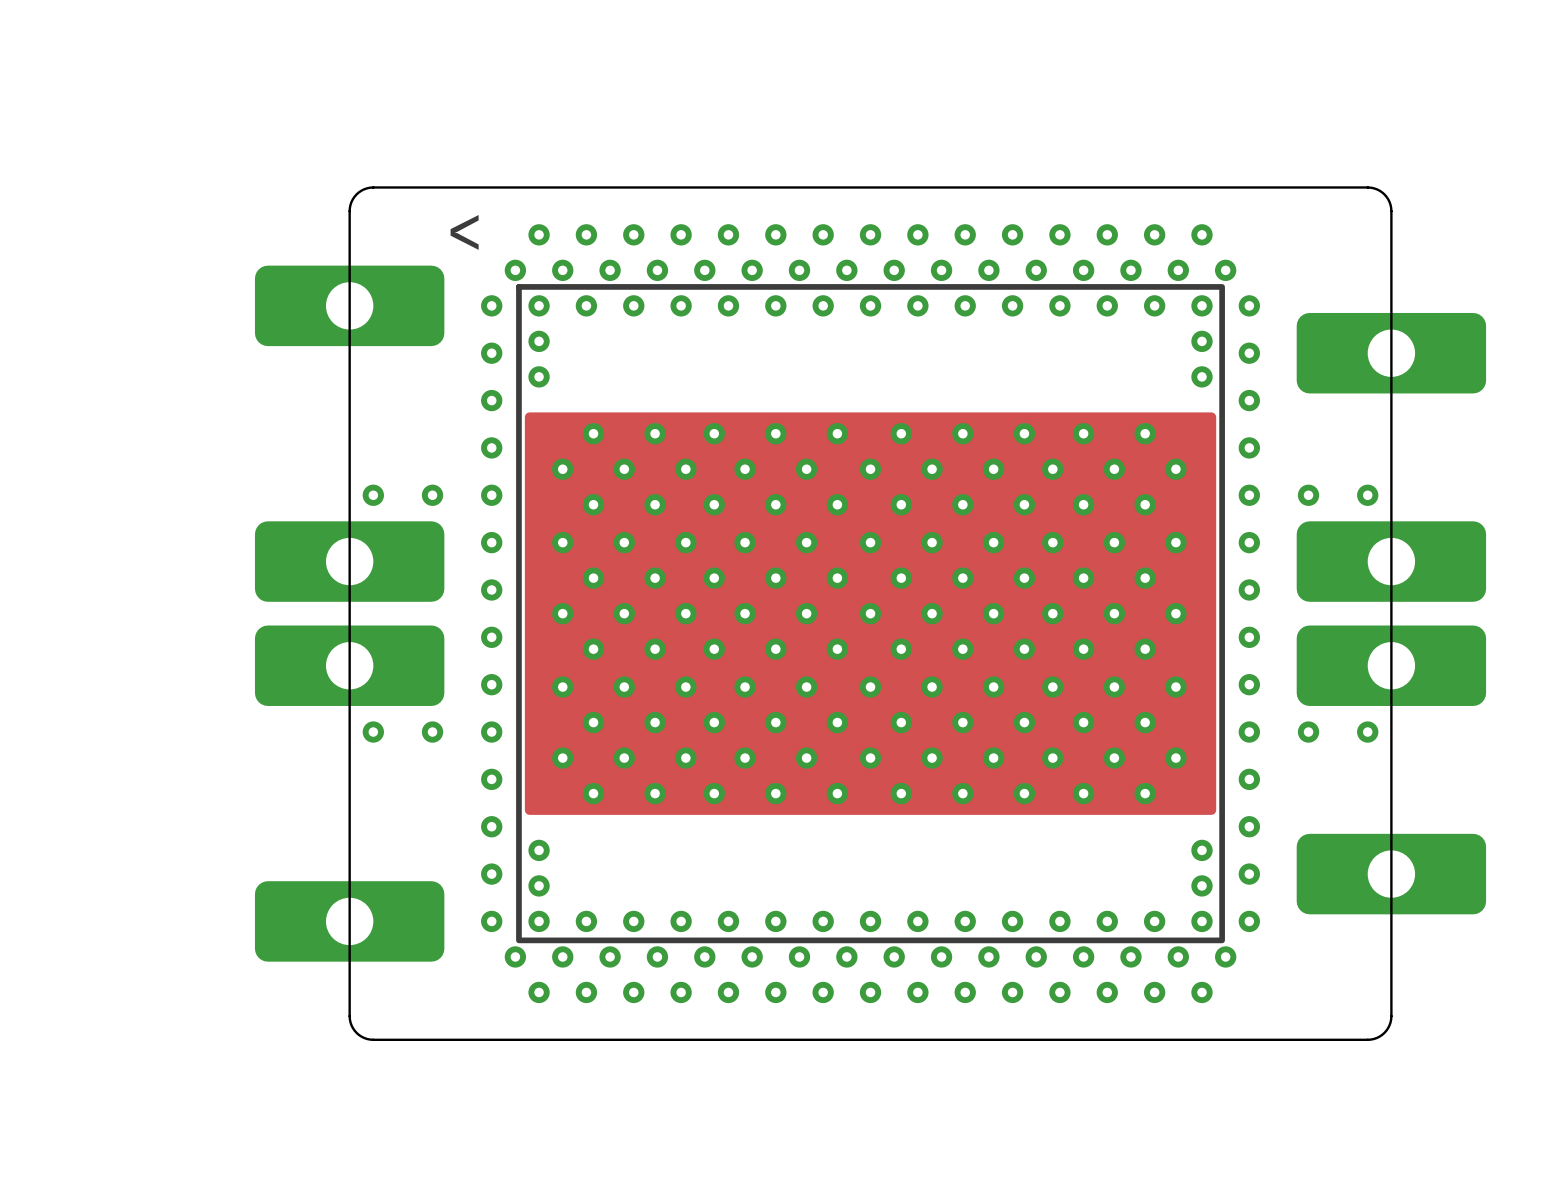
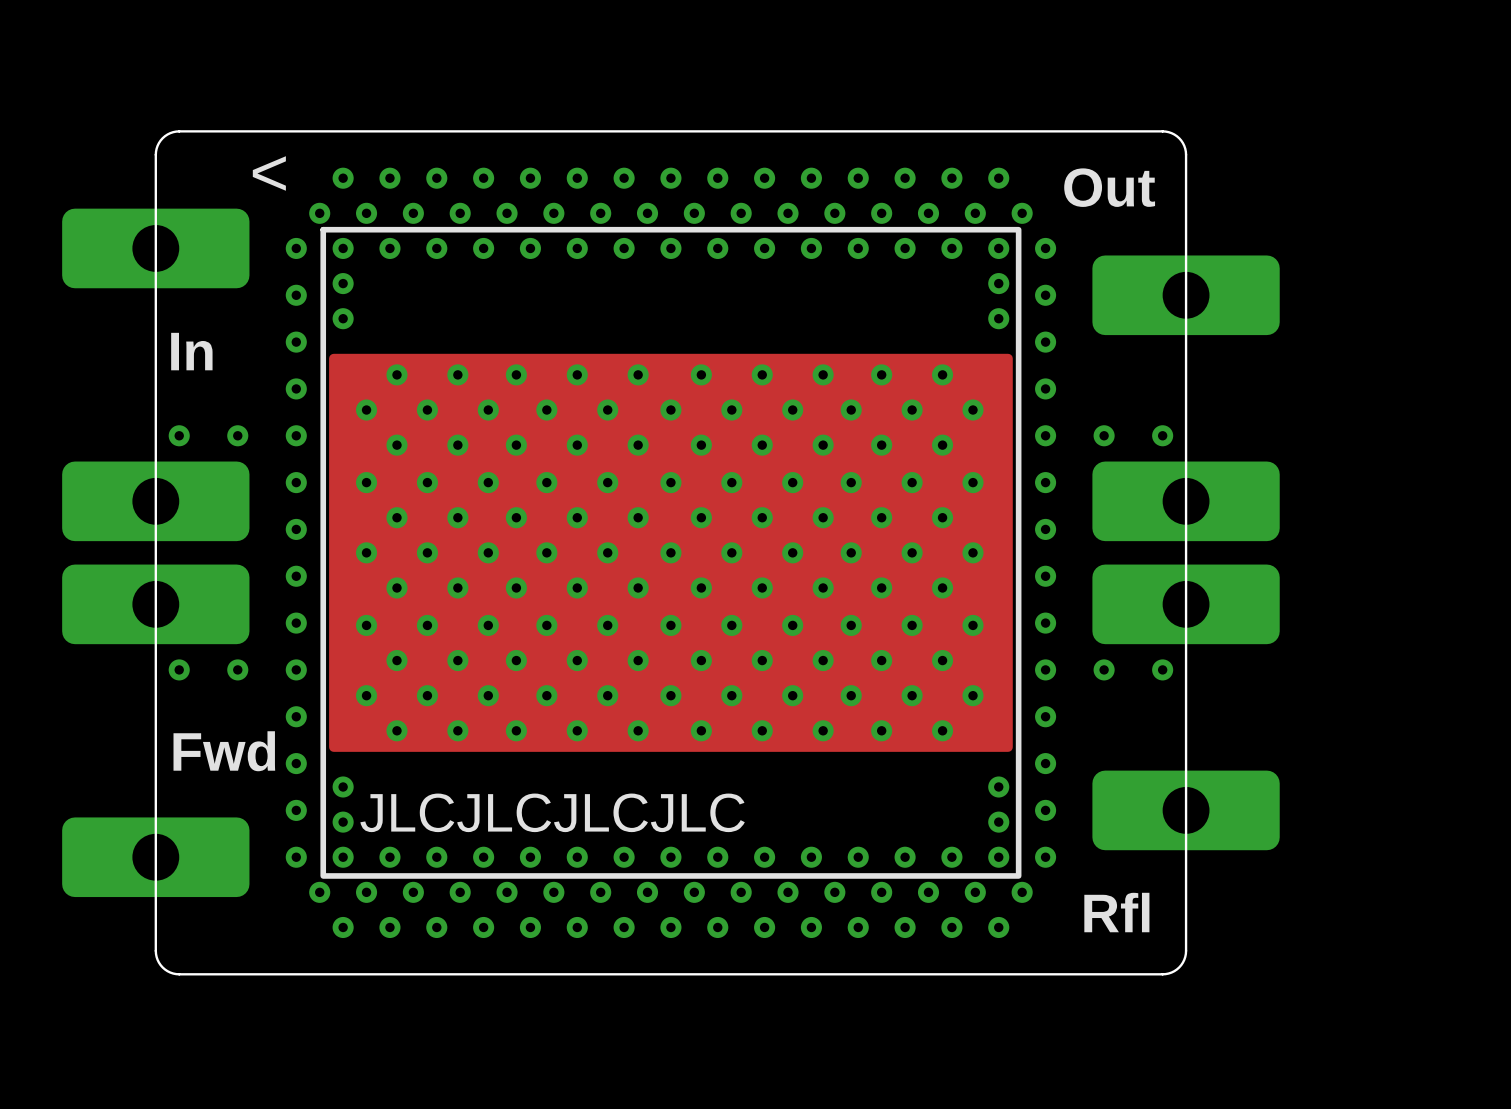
text: none -> Out (1109, 187)
text: none -> In (191, 351)
text: none -> Fwd (224, 751)
text: none -> JLCJLCJLCJLC (552, 812)
text: none -> Rfl (1116, 912)

